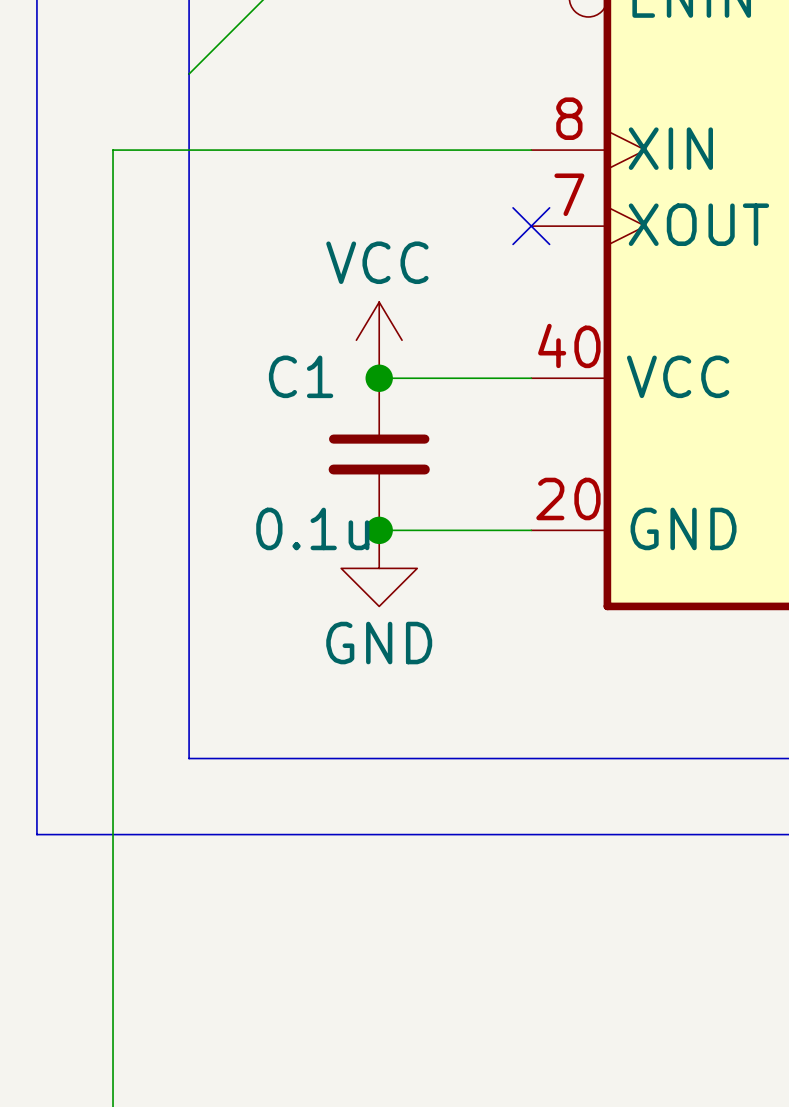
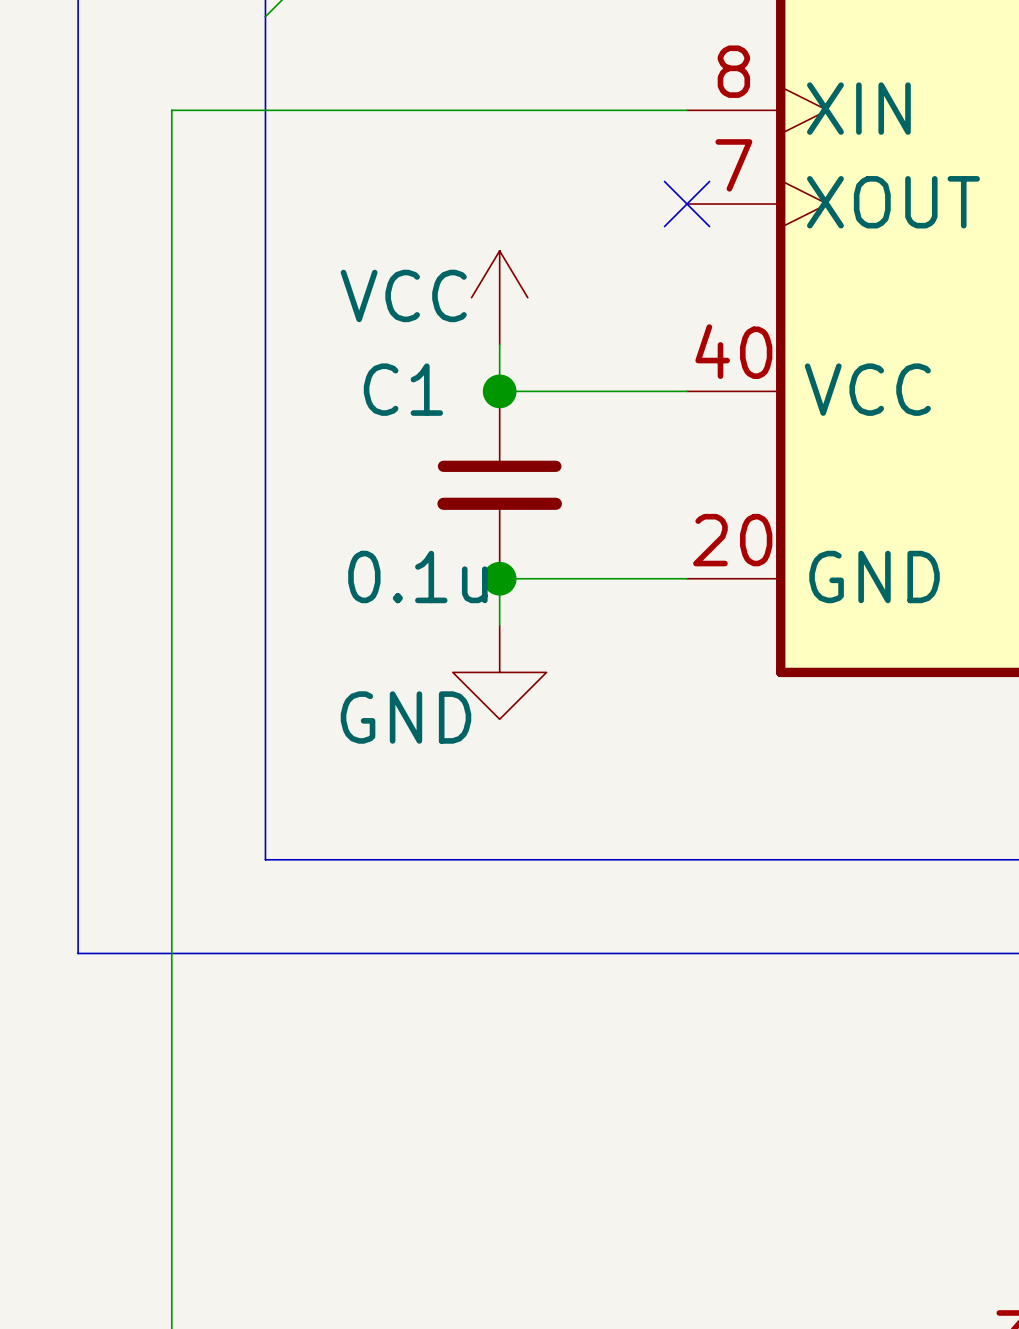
power symbol text position: VCC (377, 262) -> VCC (403, 295)
power symbol position: VCC (379, 340) -> VCC (499, 297)
power symbol position: GND (379, 568) -> GND (499, 672)
power symbol text position: GND (379, 643) -> GND (405, 717)

